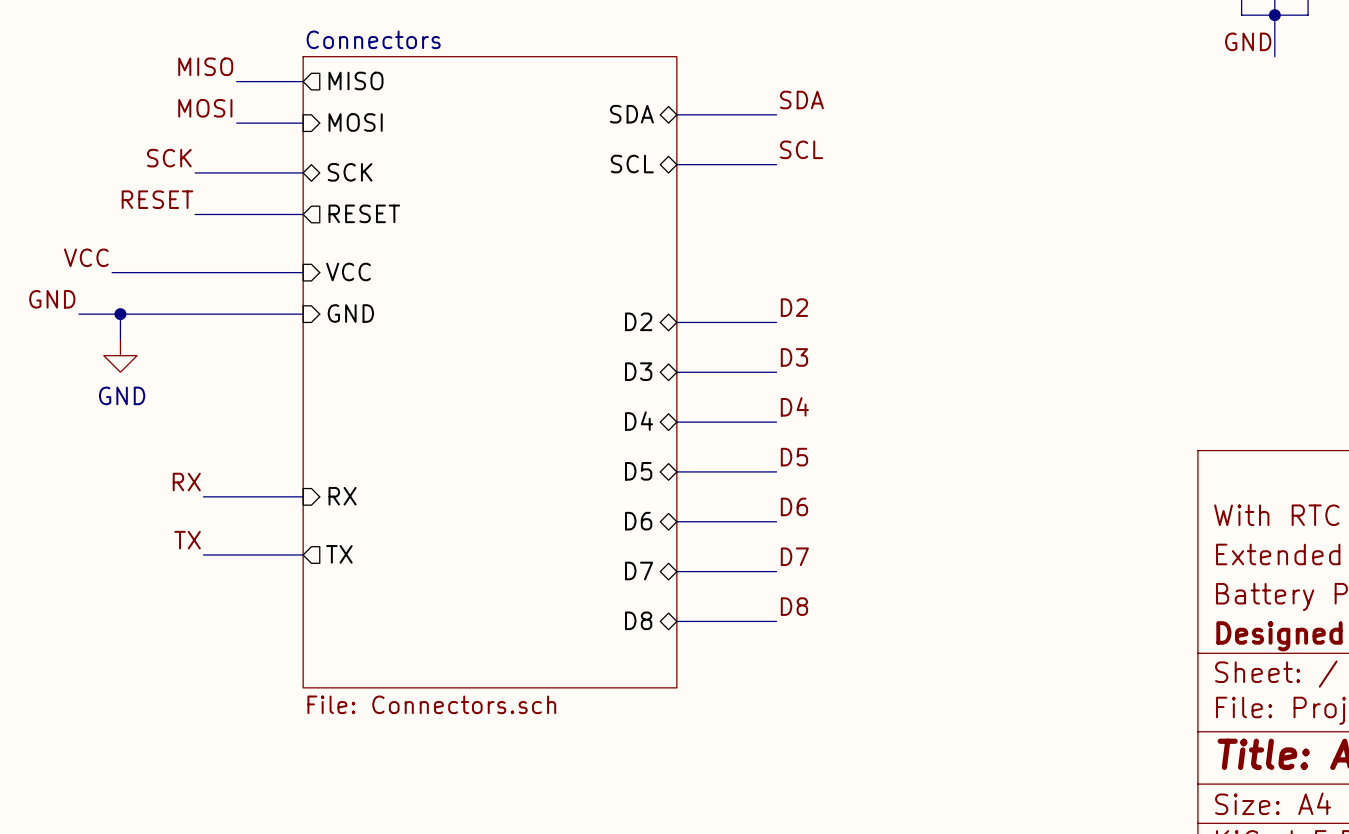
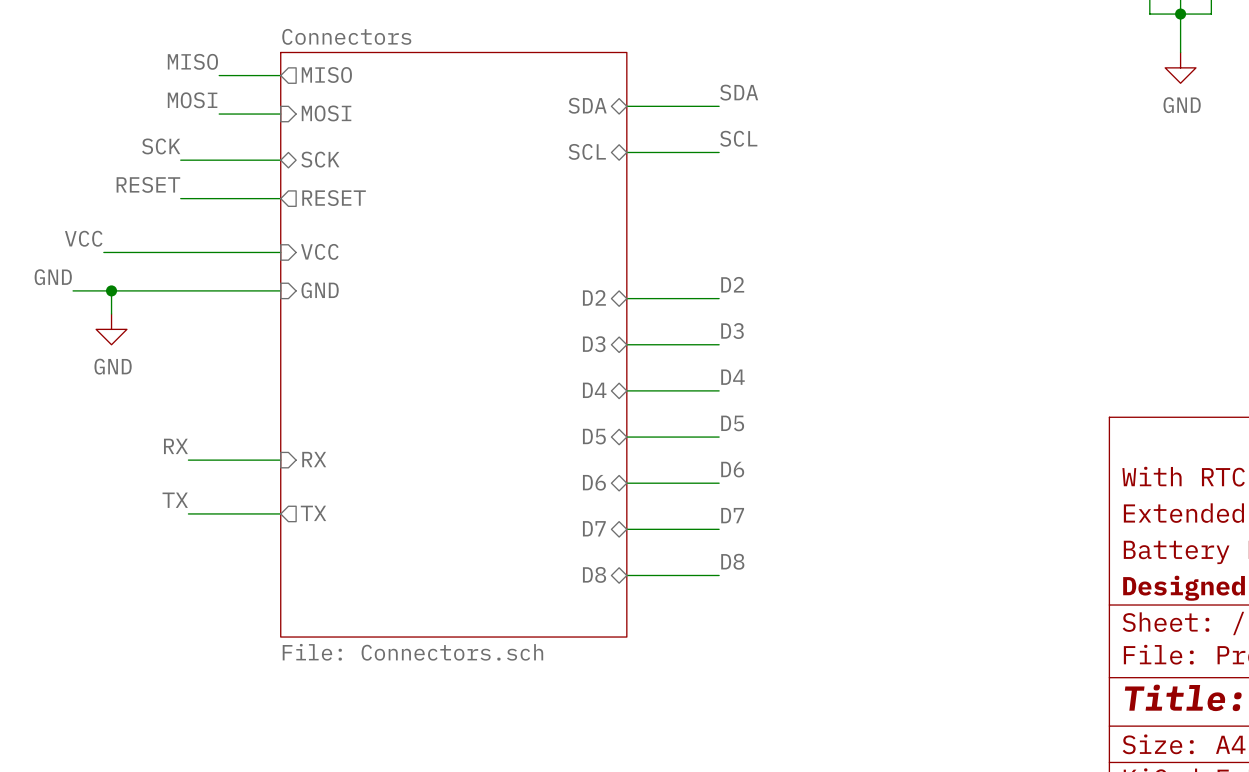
label: GND (1248, 41) -> none
power symbol: none -> GND (1180, 67)

